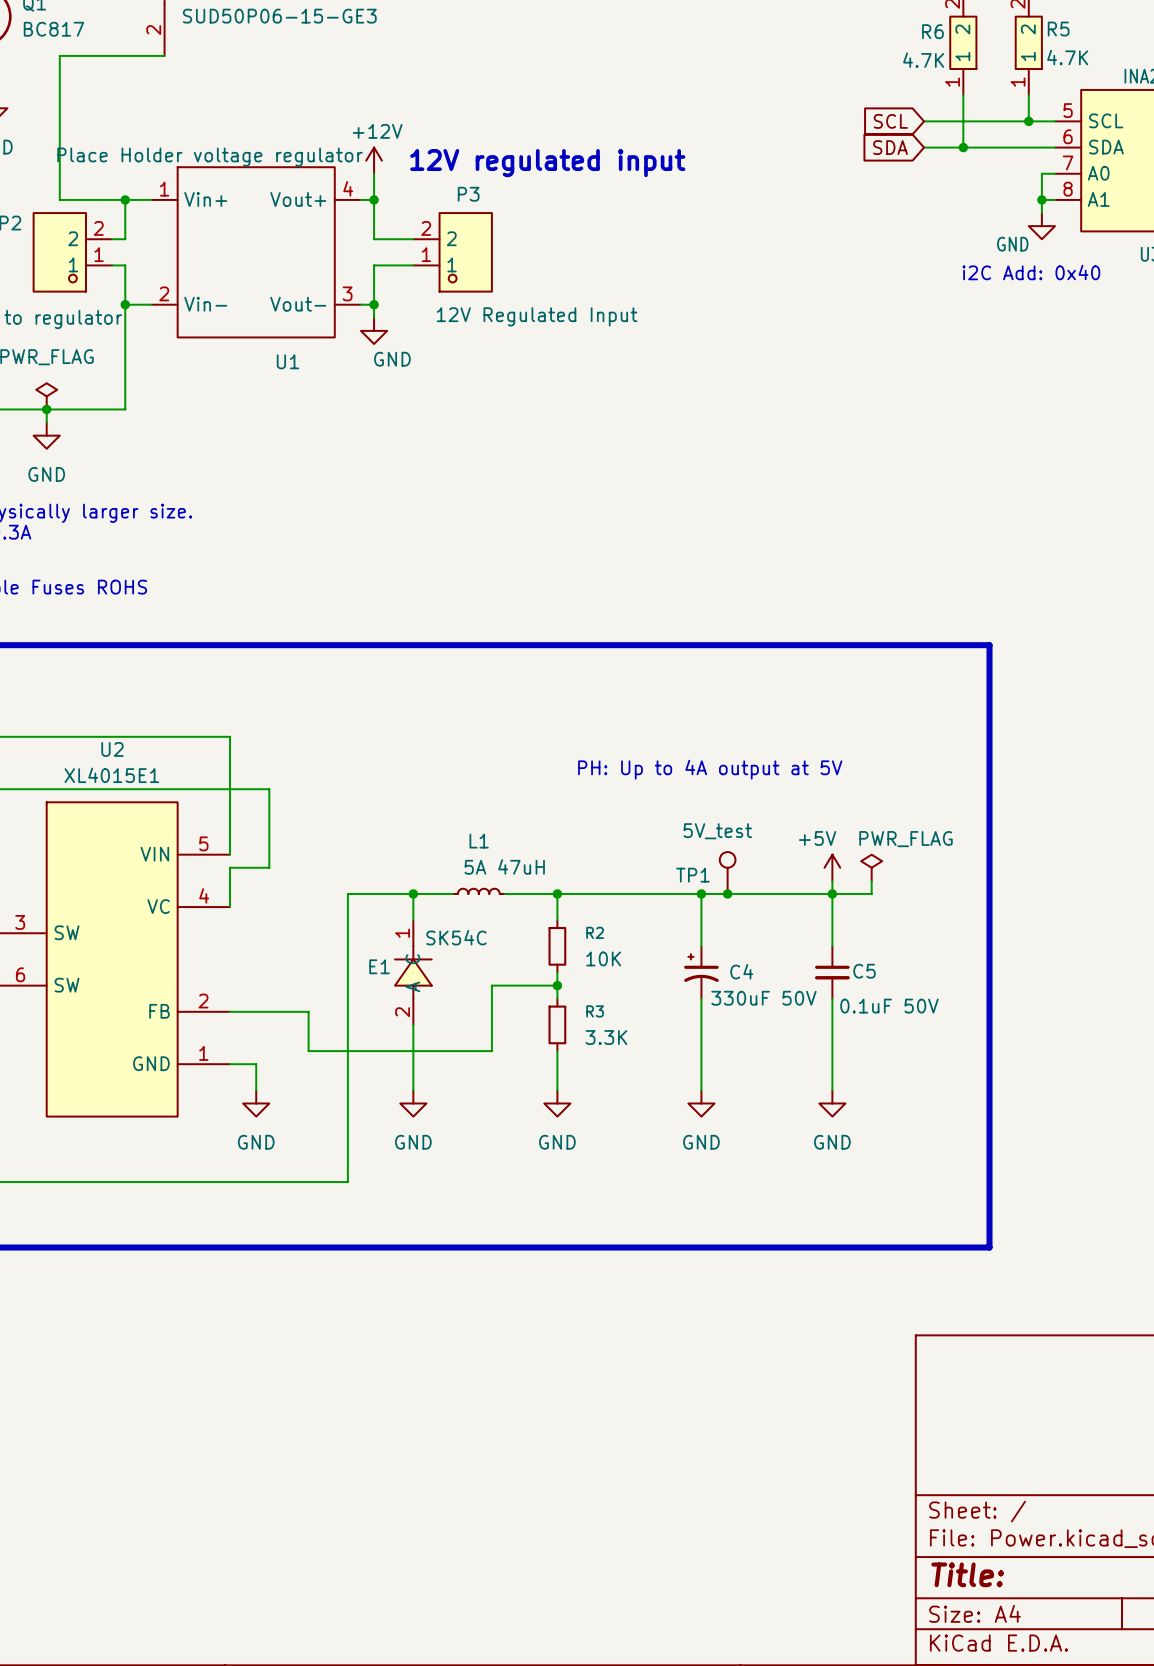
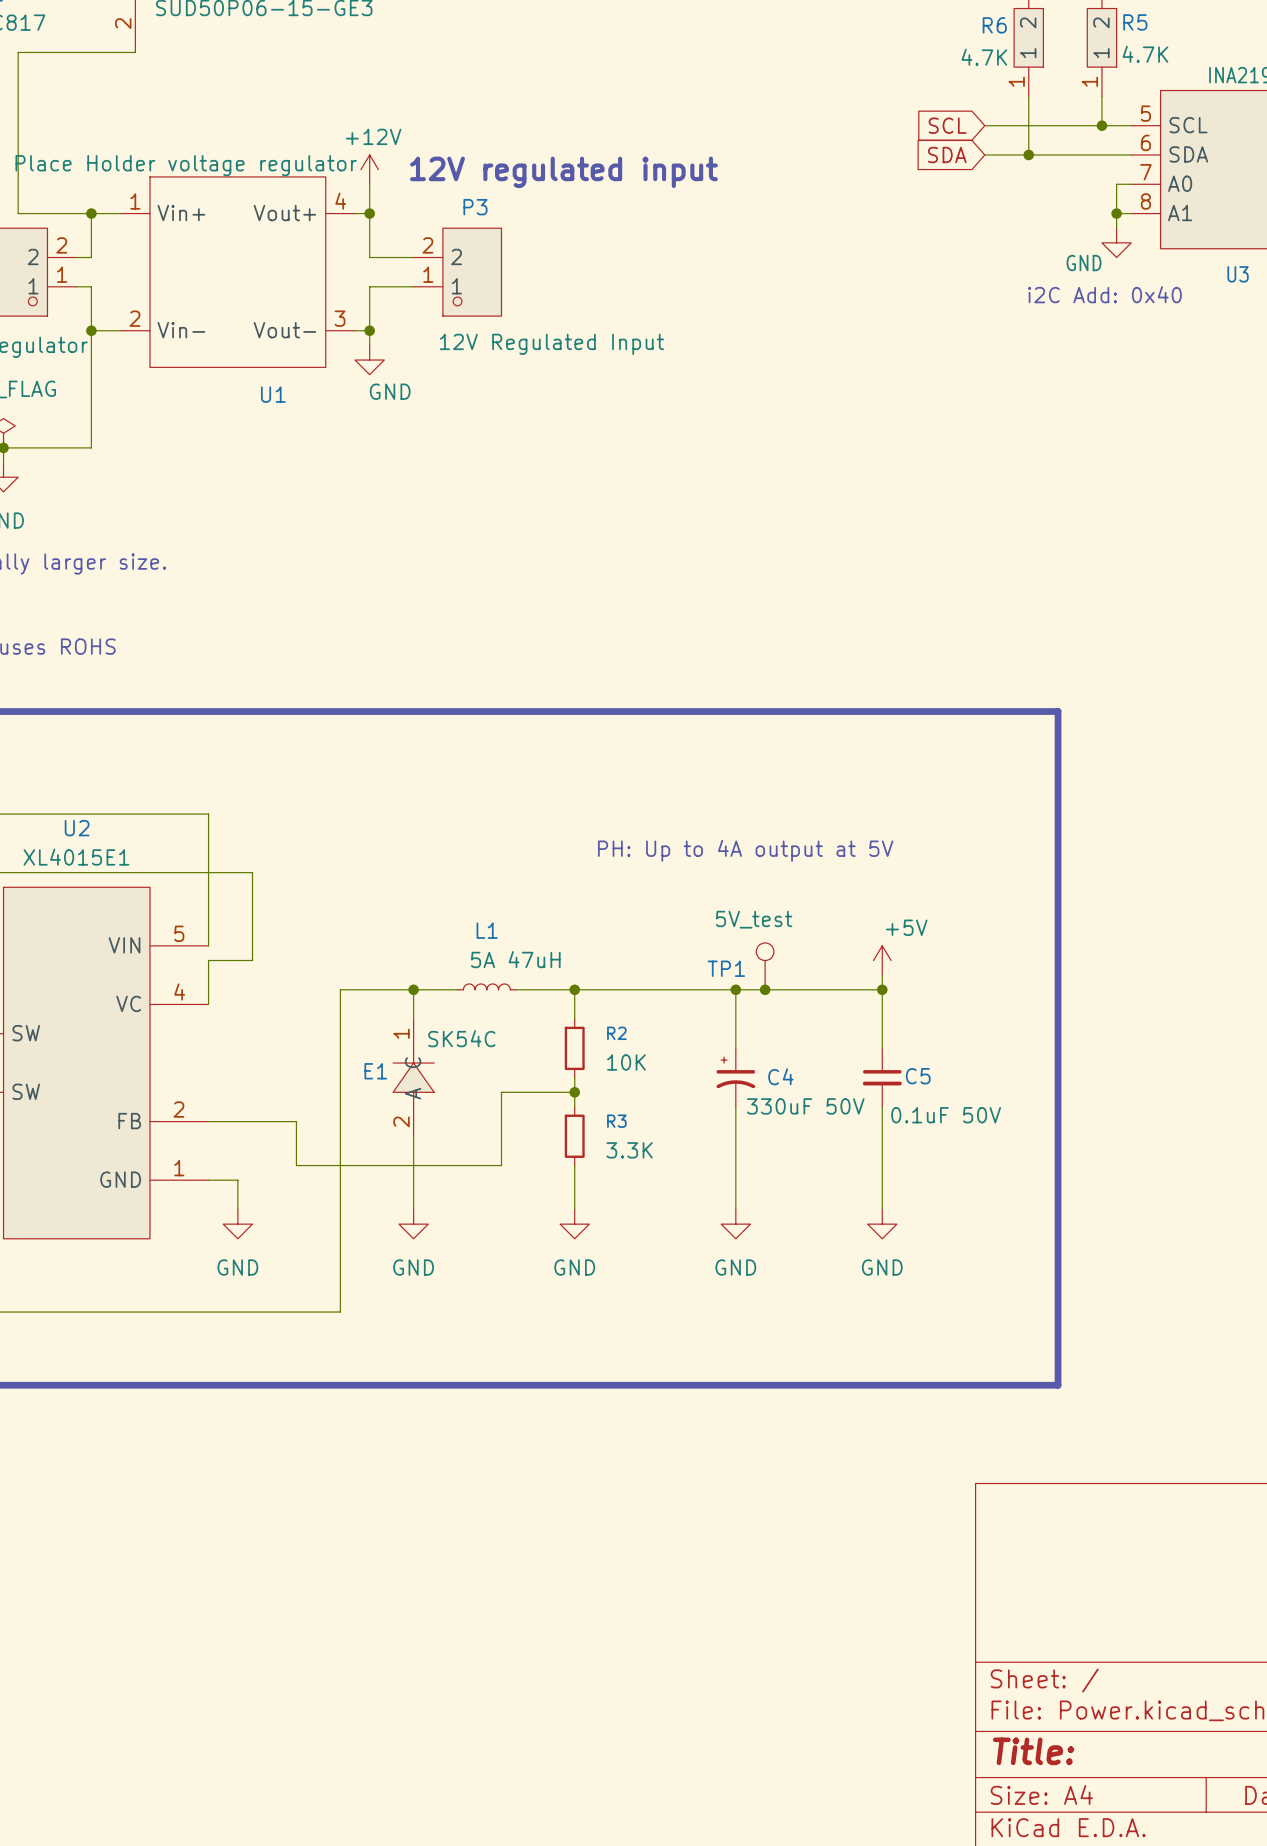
power symbol text position: +5V (817, 838) -> +5V (906, 927)
power symbol: PWR_FLAG (871, 867) -> none
wire: (871, 880) (871, 893) (832, 893) -> none

